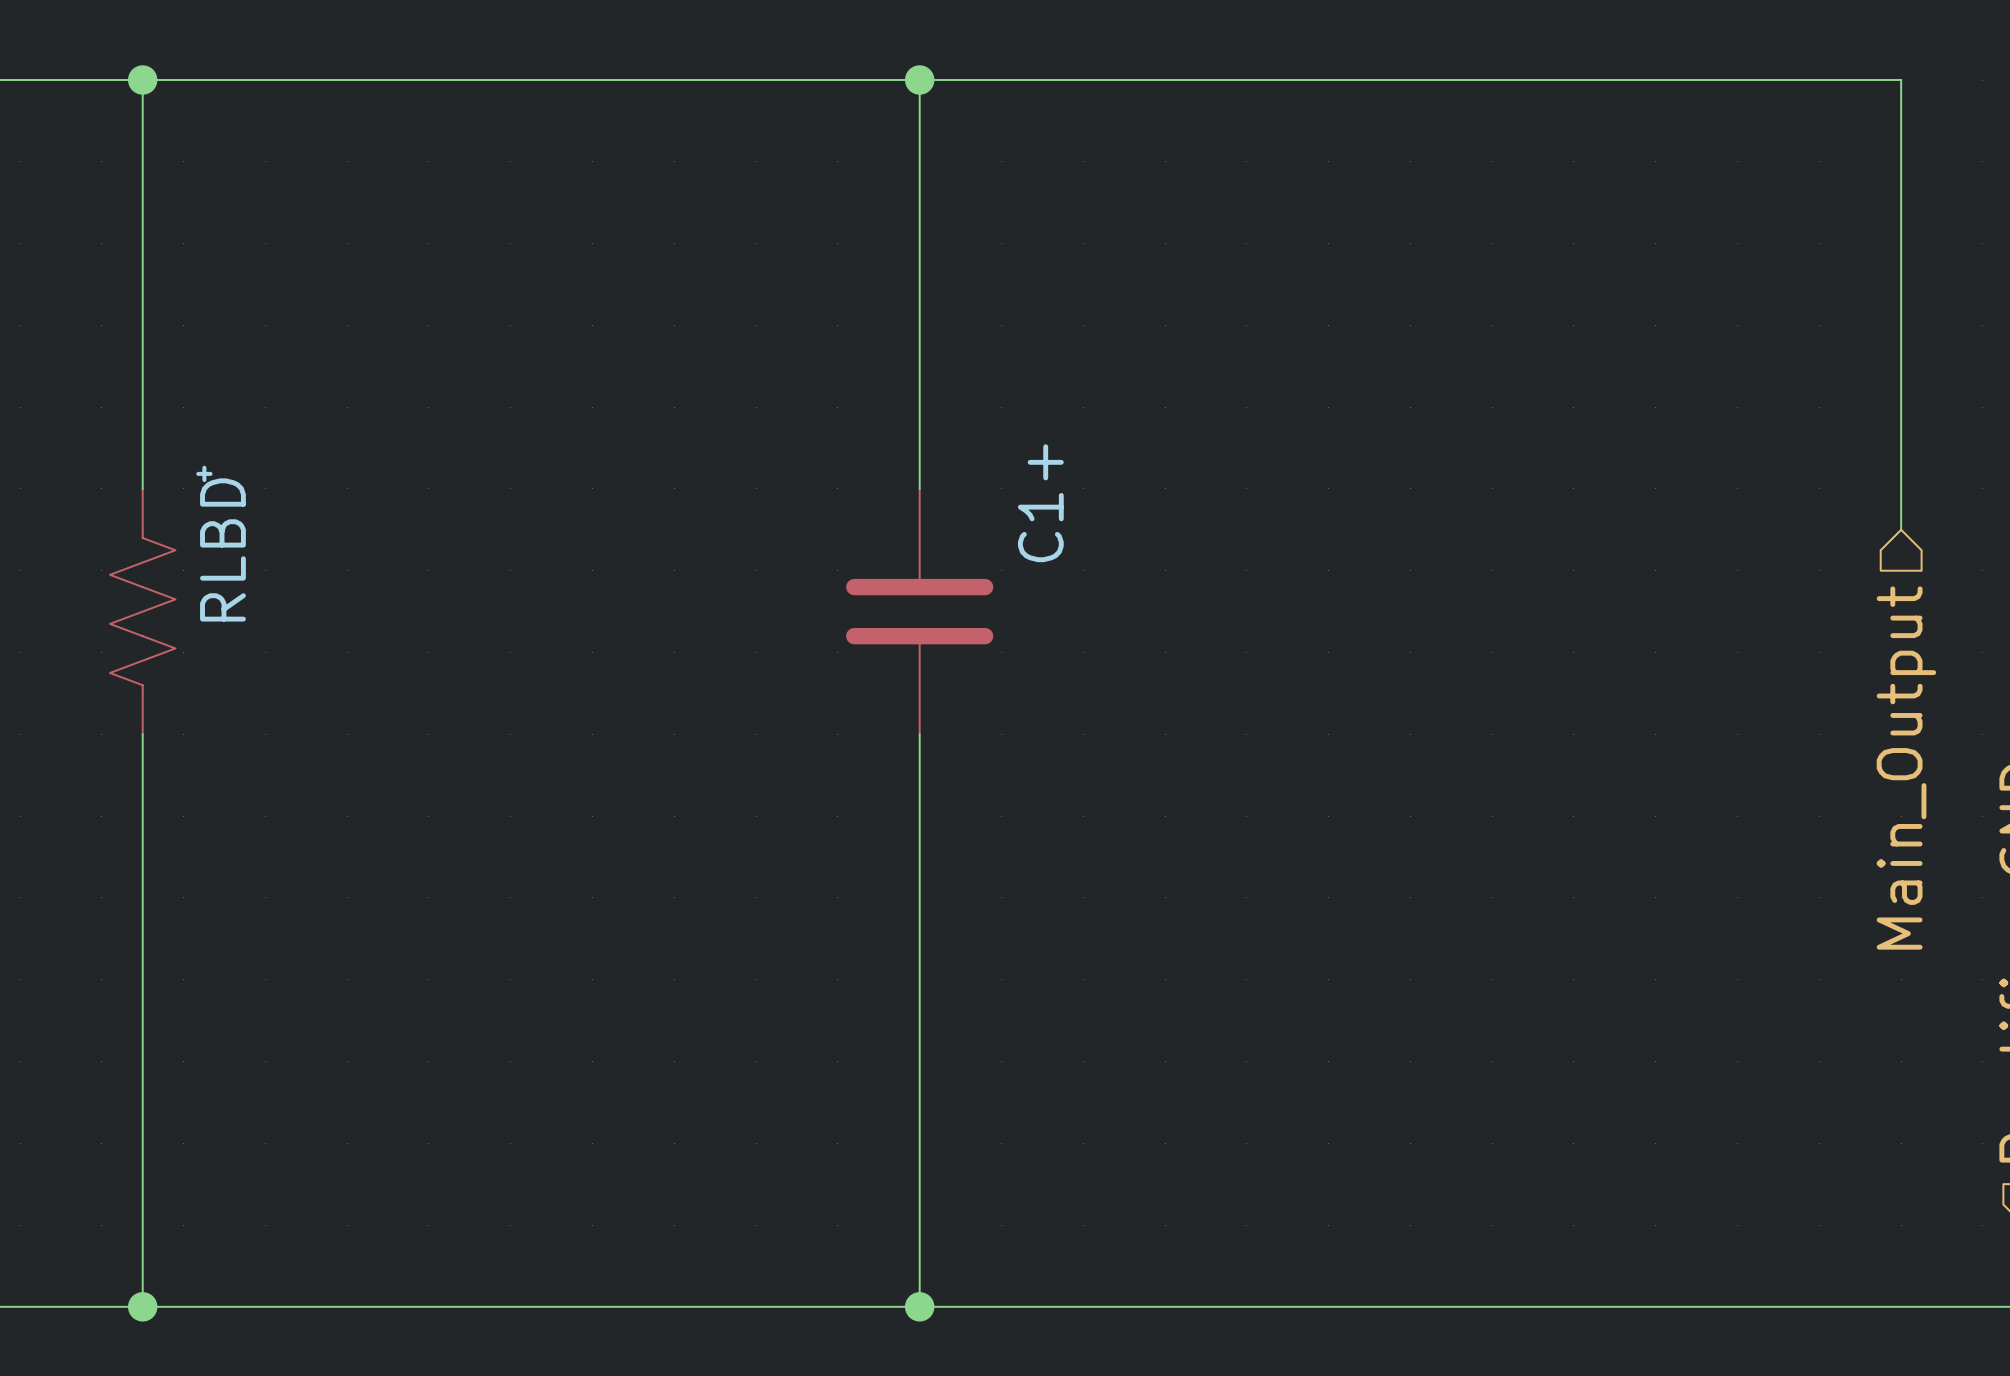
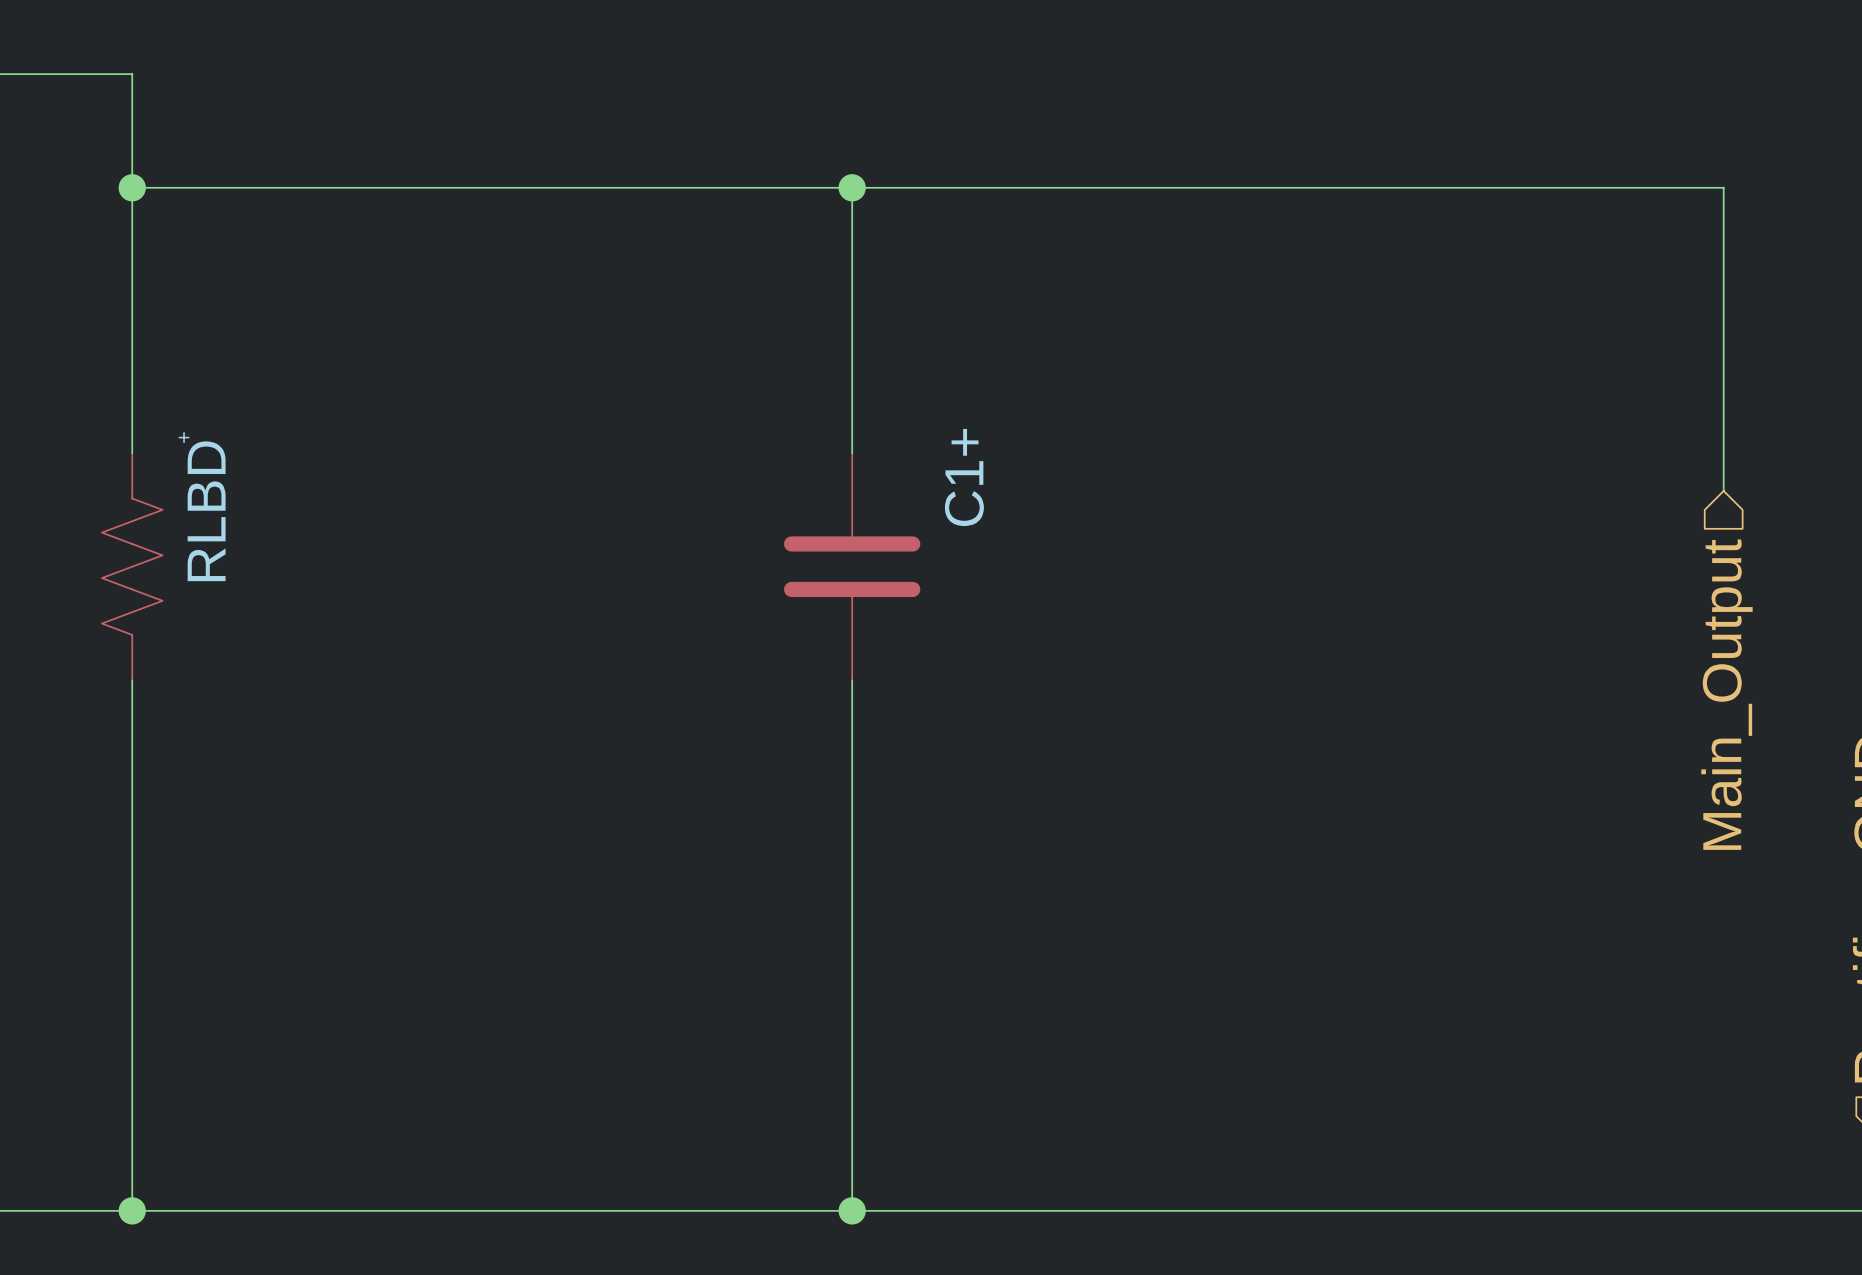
wire: (142, 80) (1901, 80) (1901, 529) -> none
junction position: (142, 80) -> (132, 187)
wire: (919, 80) (919, 202) -> none
junction position: (919, 80) -> (852, 187)
wire: none -> (132, 187) (1723, 187) (1723, 490)
hierarchical label position: Main_Output (1906, 768) -> Main_Output (1726, 694)

